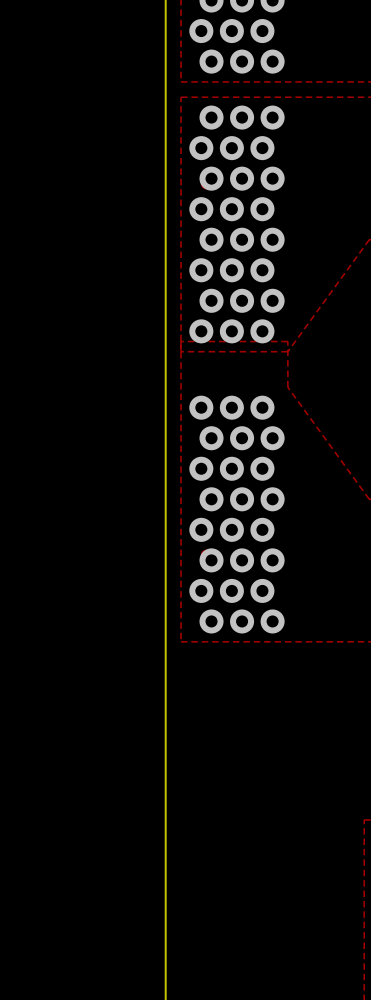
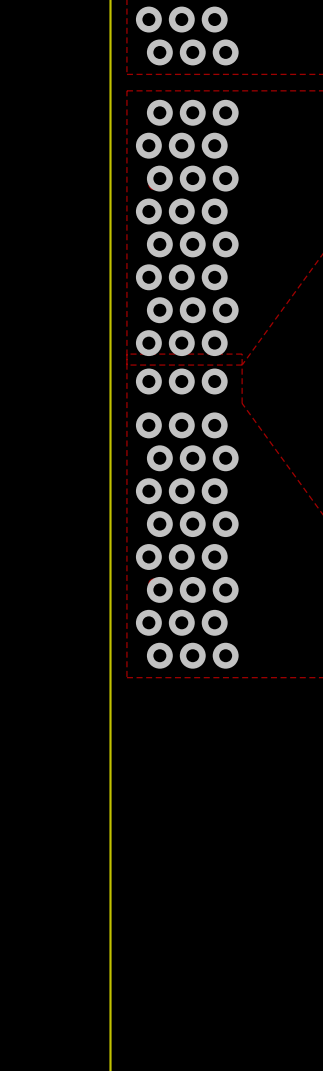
via: none -> (148, 381)
via: none -> (181, 381)
via: none -> (214, 381)

